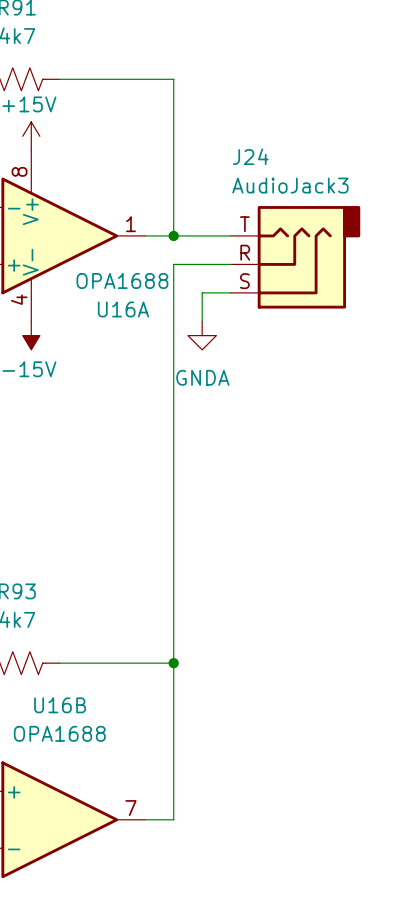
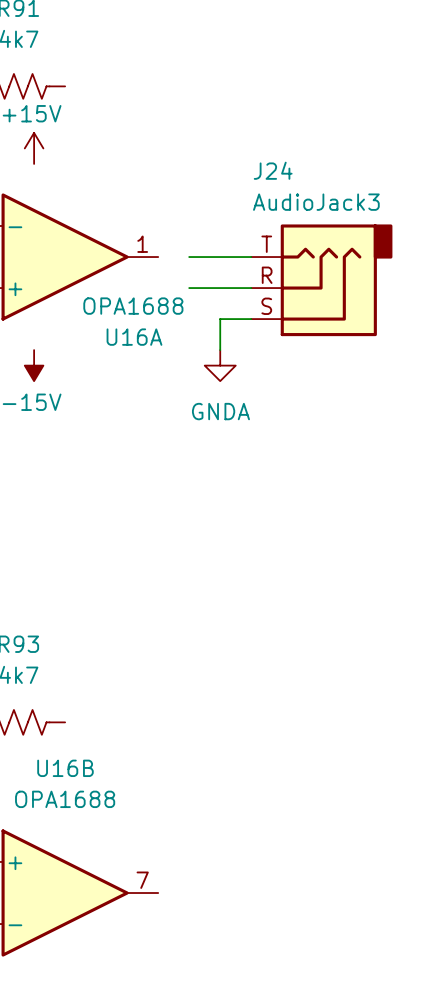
wire: (59, 79) (173, 79) (173, 235) (145, 235) -> none
part: (31, 235) -> none
junction: (173, 235) -> none
wire: (173, 264) (173, 819) (145, 819) -> none
wire: (59, 663) (173, 663) -> none
junction: (173, 663) -> none

